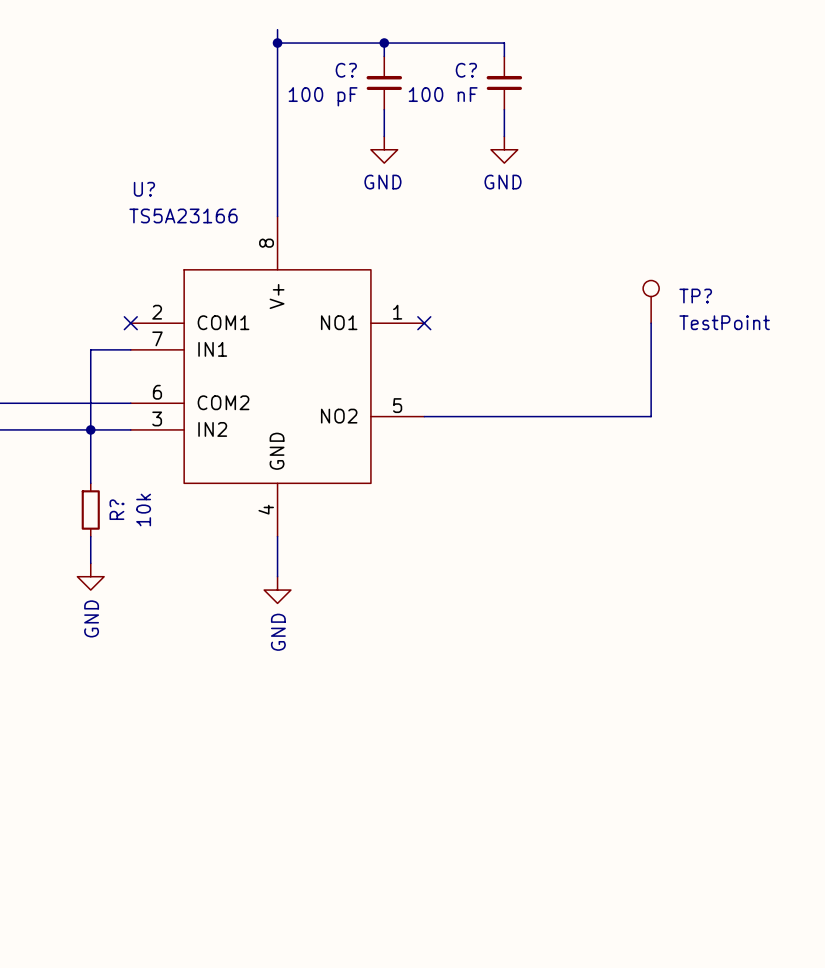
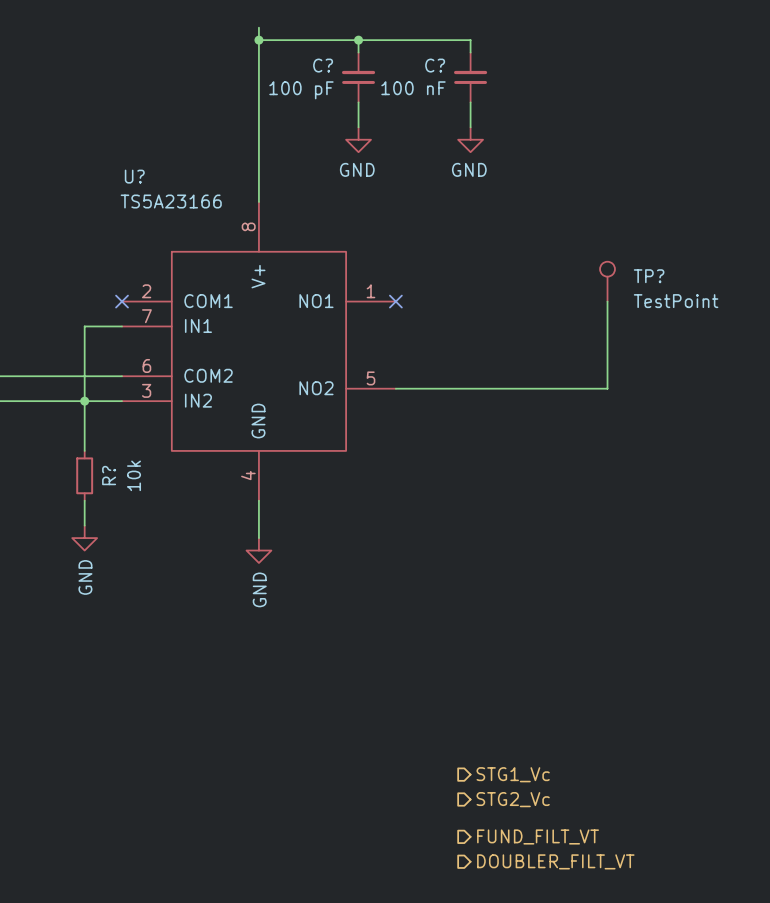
hierarchical label: none -> STG1_Vc (513, 774)
hierarchical label: none -> STG2_Vc (513, 799)
hierarchical label: none -> FUND_FILT_VT (538, 836)
hierarchical label: none -> DOUBLER_FILT_VT (555, 861)

